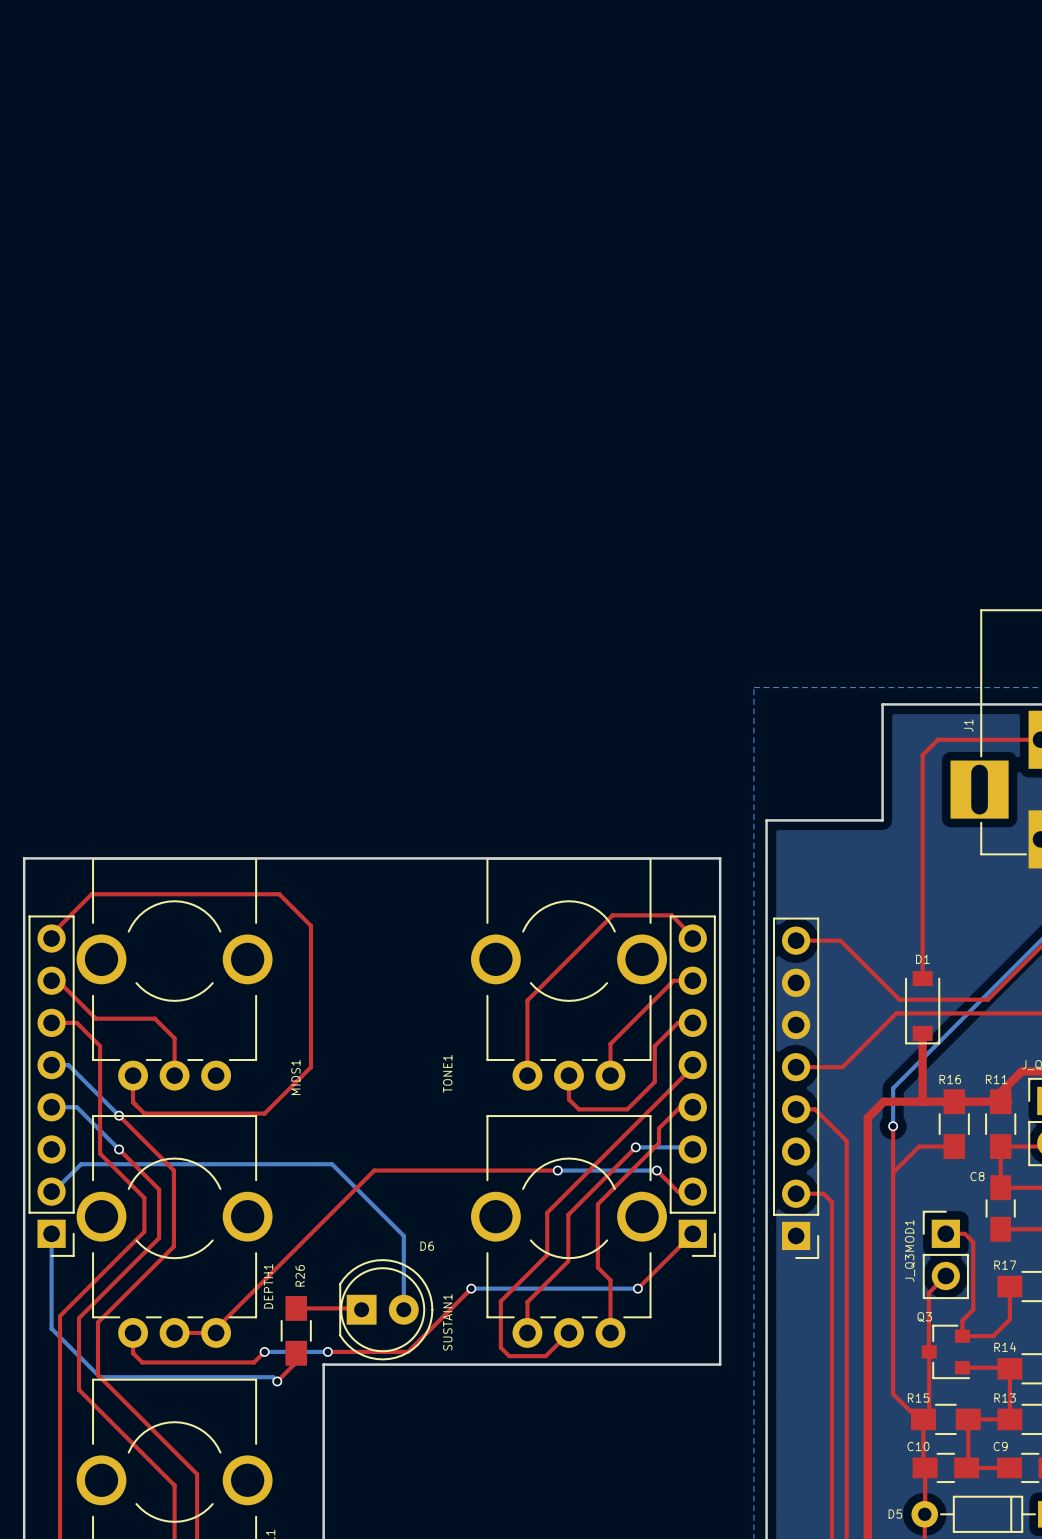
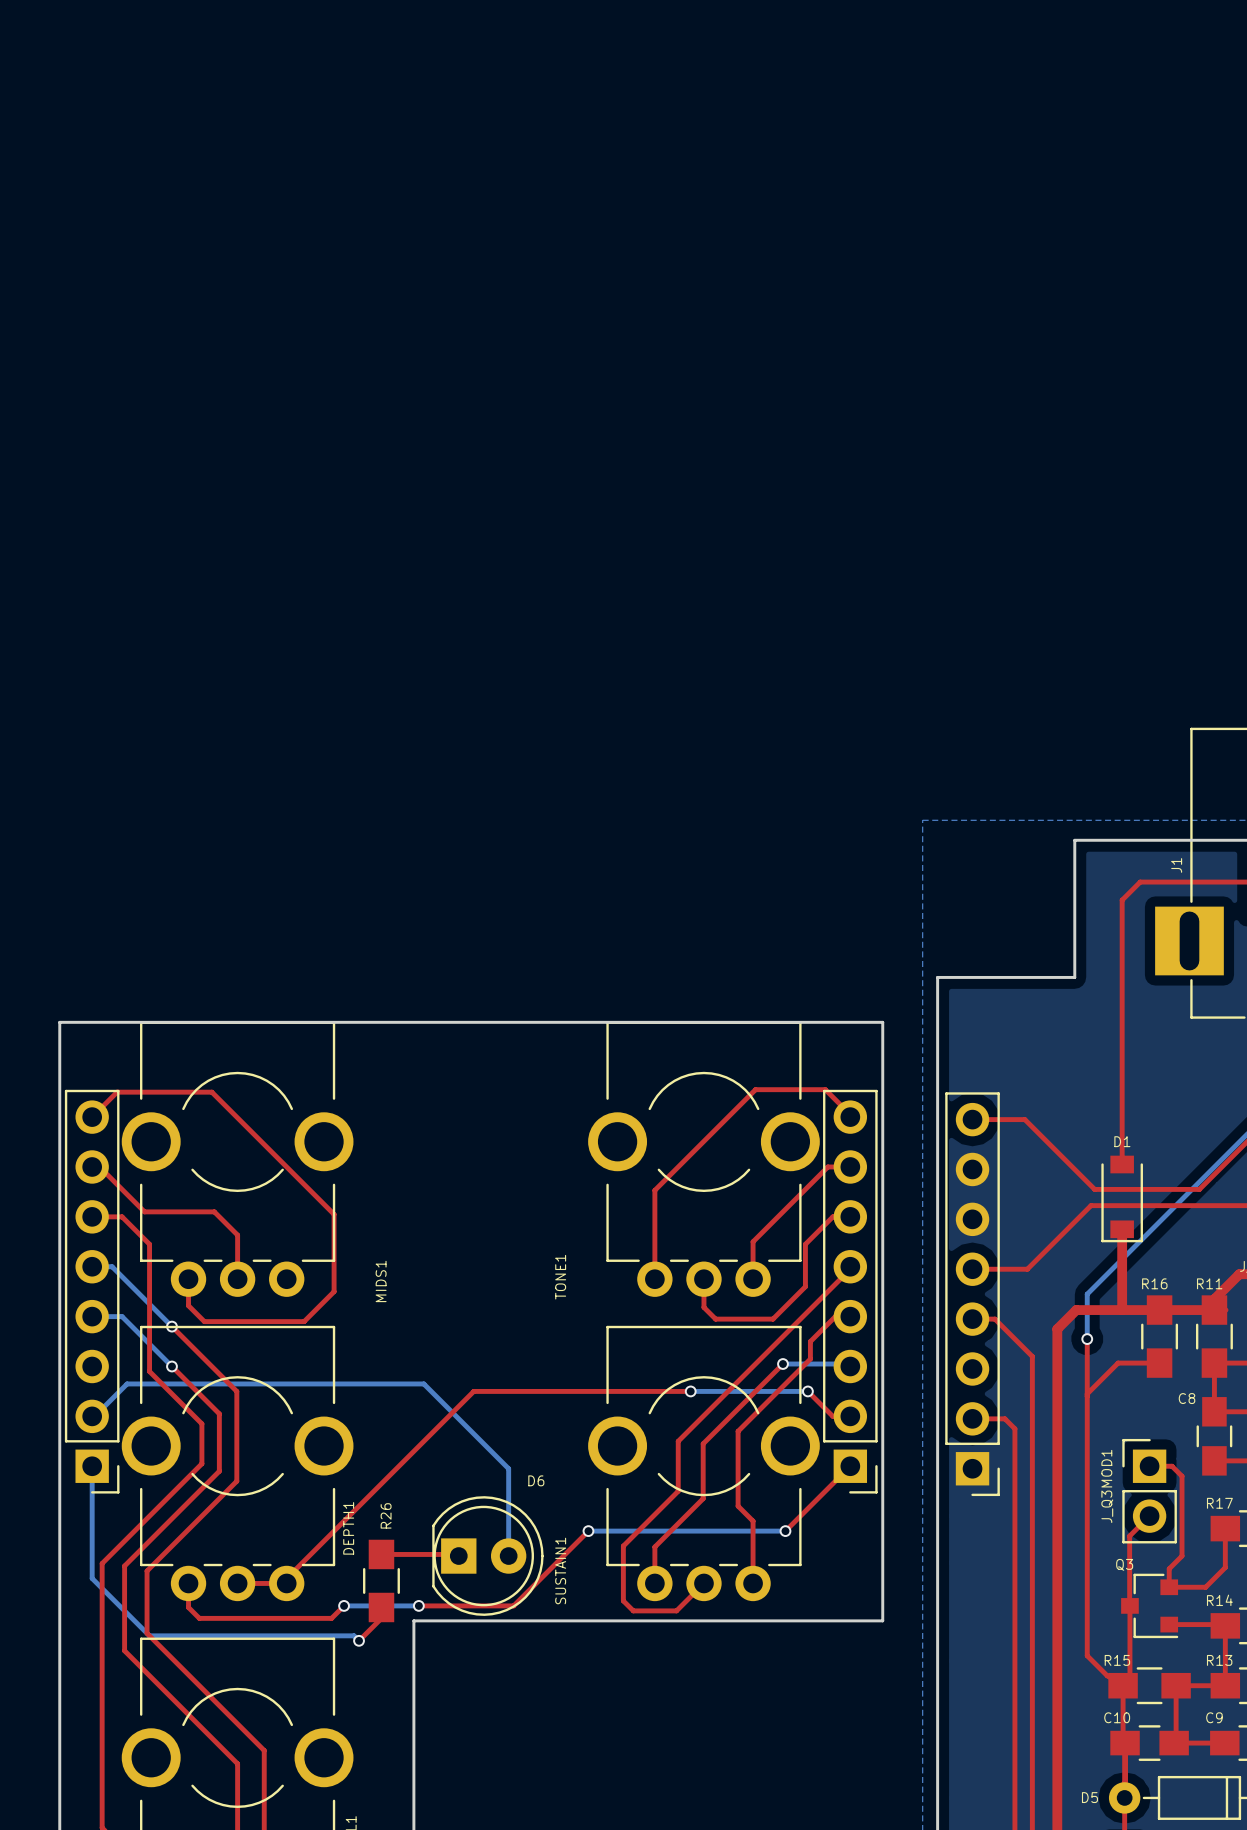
top track: (51, 934) (91, 894) (279, 894) (311, 925) (311, 1067) (264, 1113) (144, 1113) (133, 1102) (133, 1098) -> (92, 1117) (117, 1092) (211, 1092) (334, 1214) (334, 1291) (304, 1321) (204, 1321) (188, 1305)

